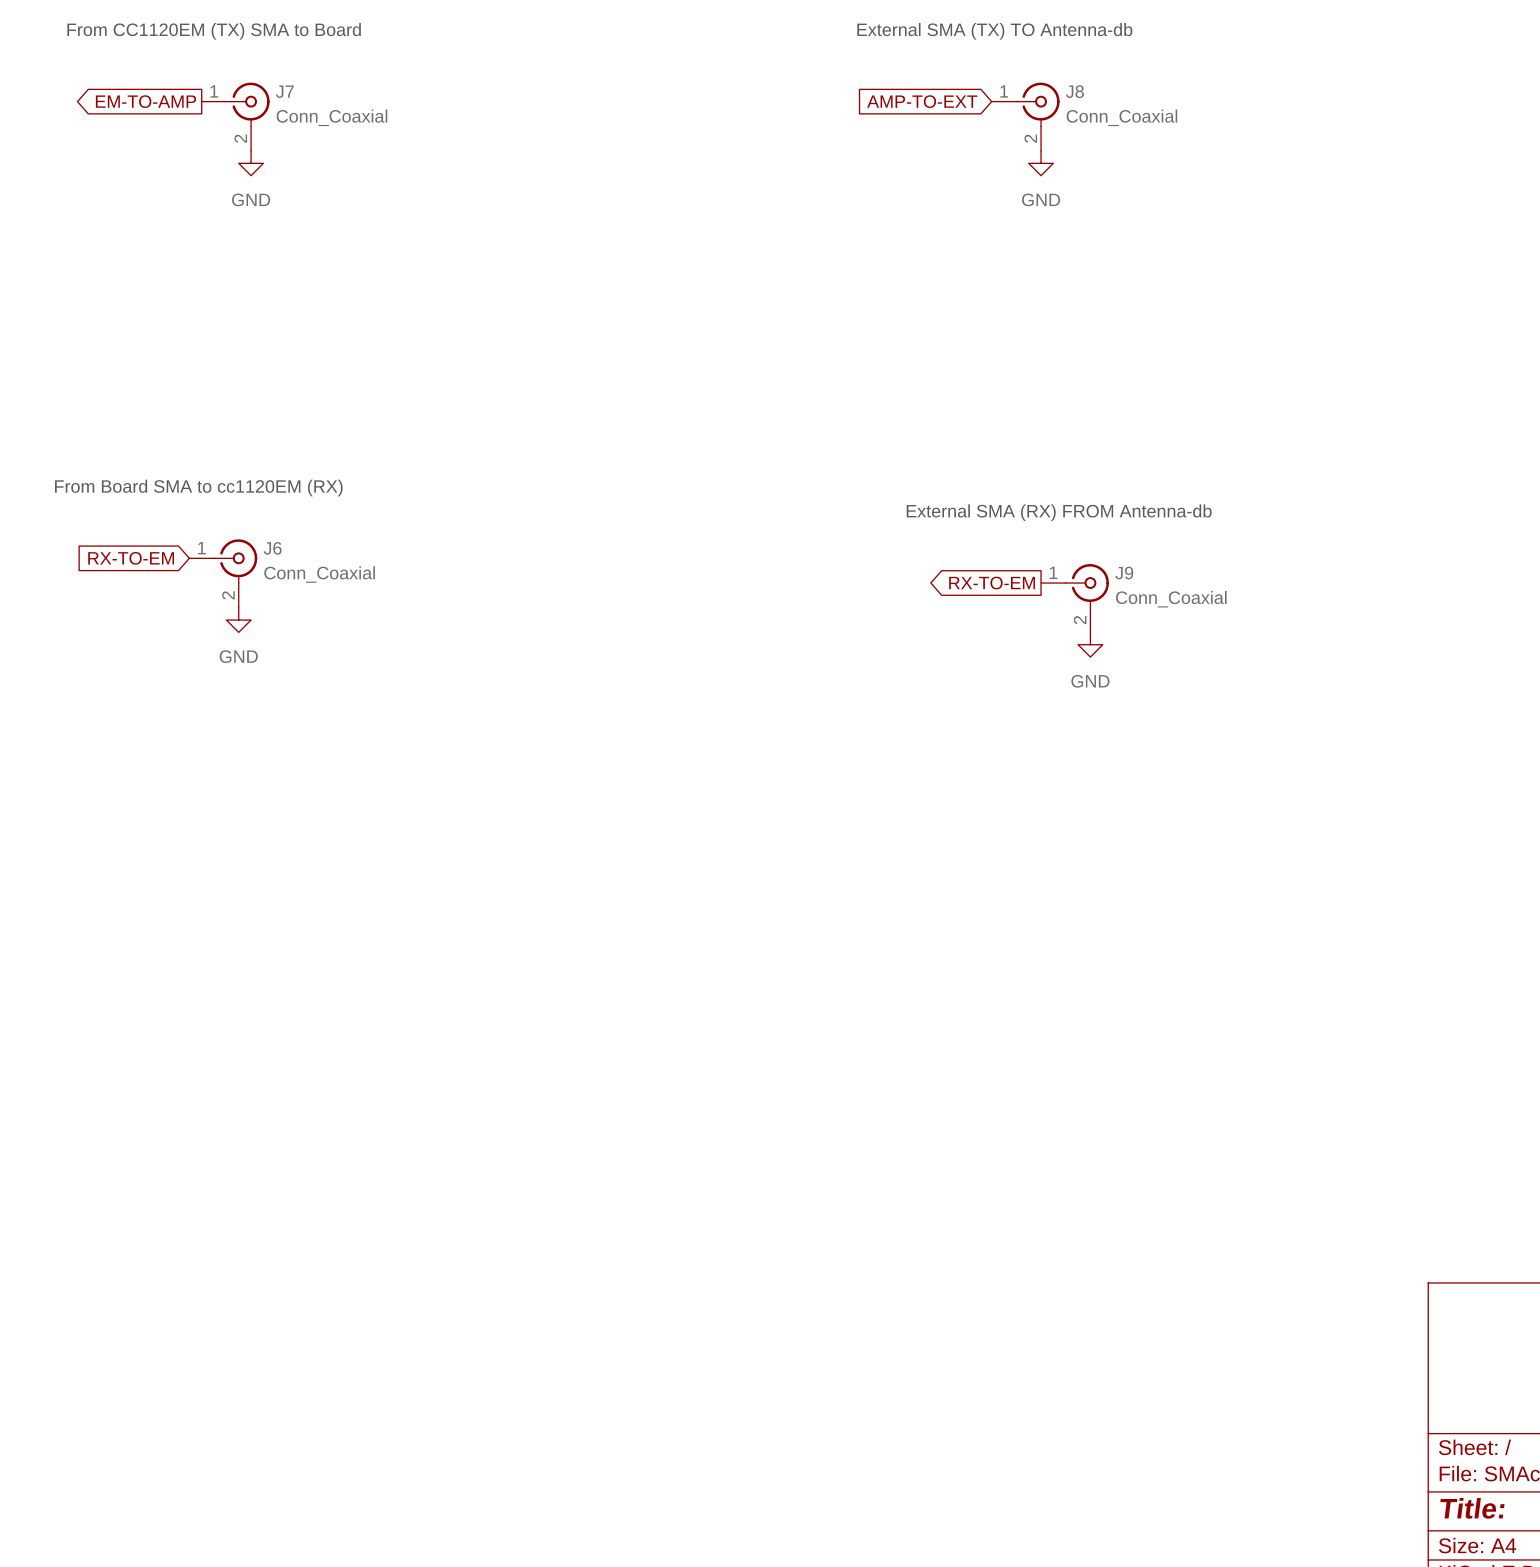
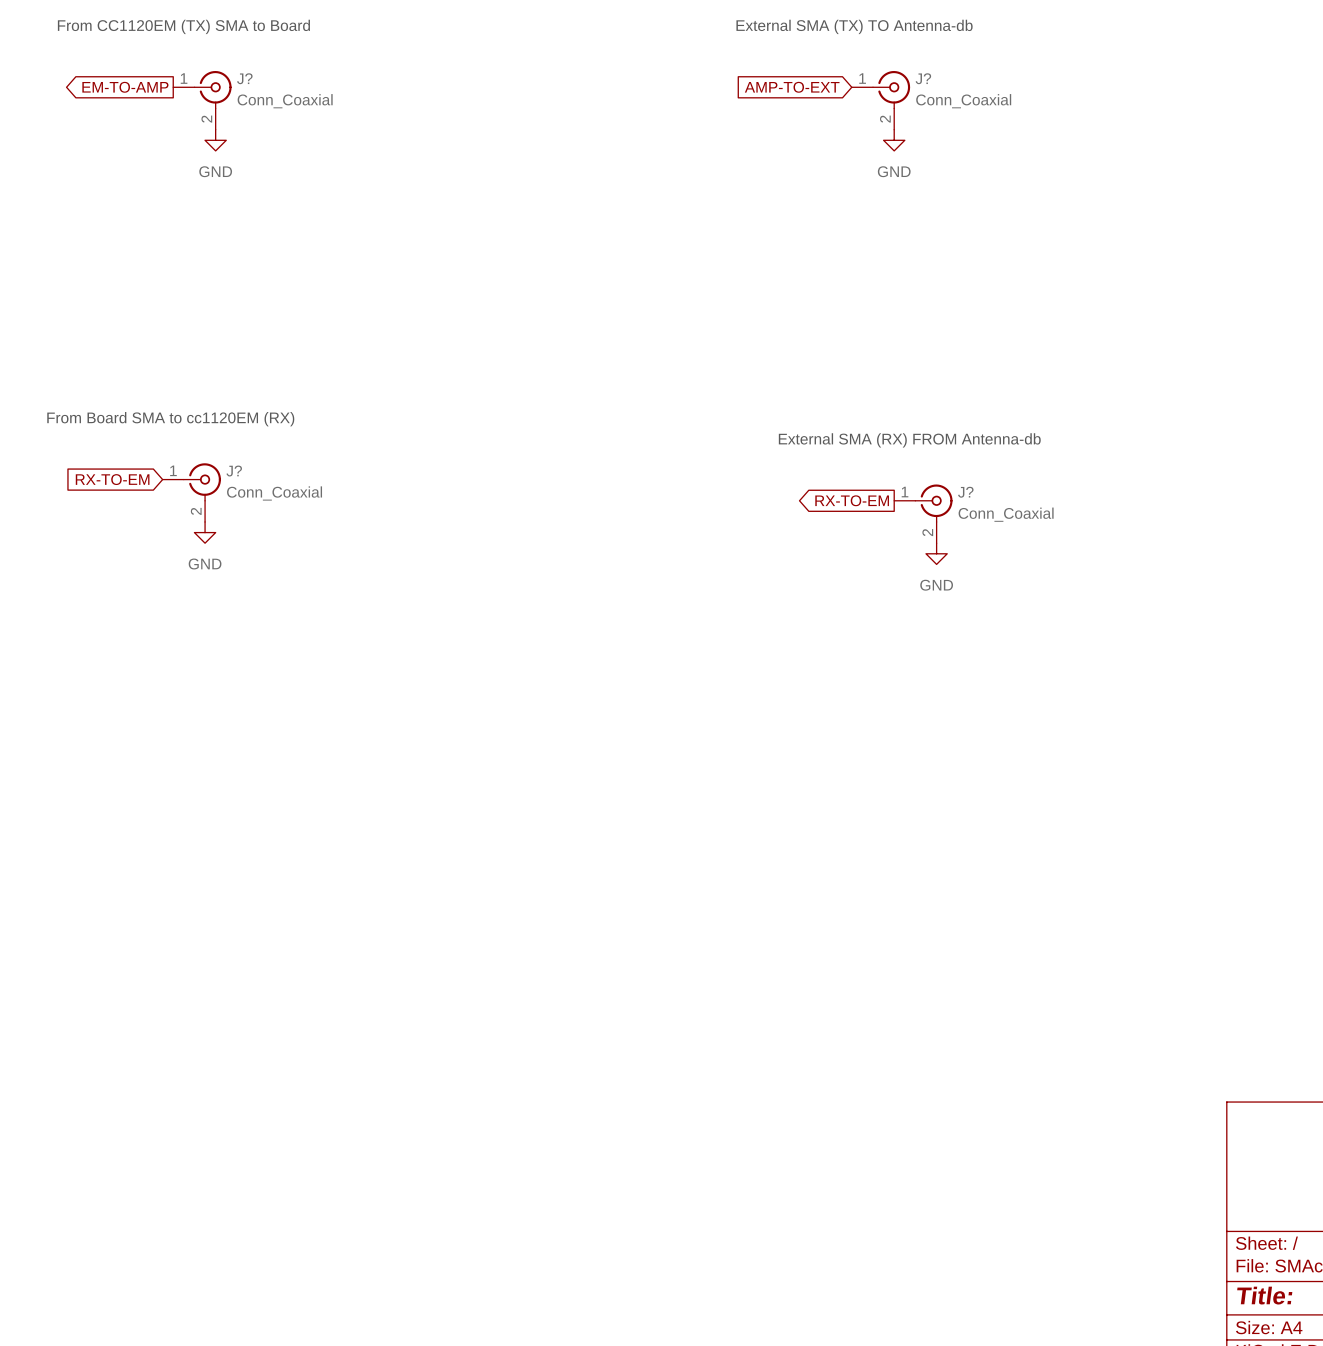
J7 name: J7 (284, 91) -> J? (244, 78)
J8 name: J8 (1074, 91) -> J? (923, 78)
J6 name: J6 (272, 548) -> J? (234, 471)
J9 name: J9 (1124, 573) -> J? (965, 492)

